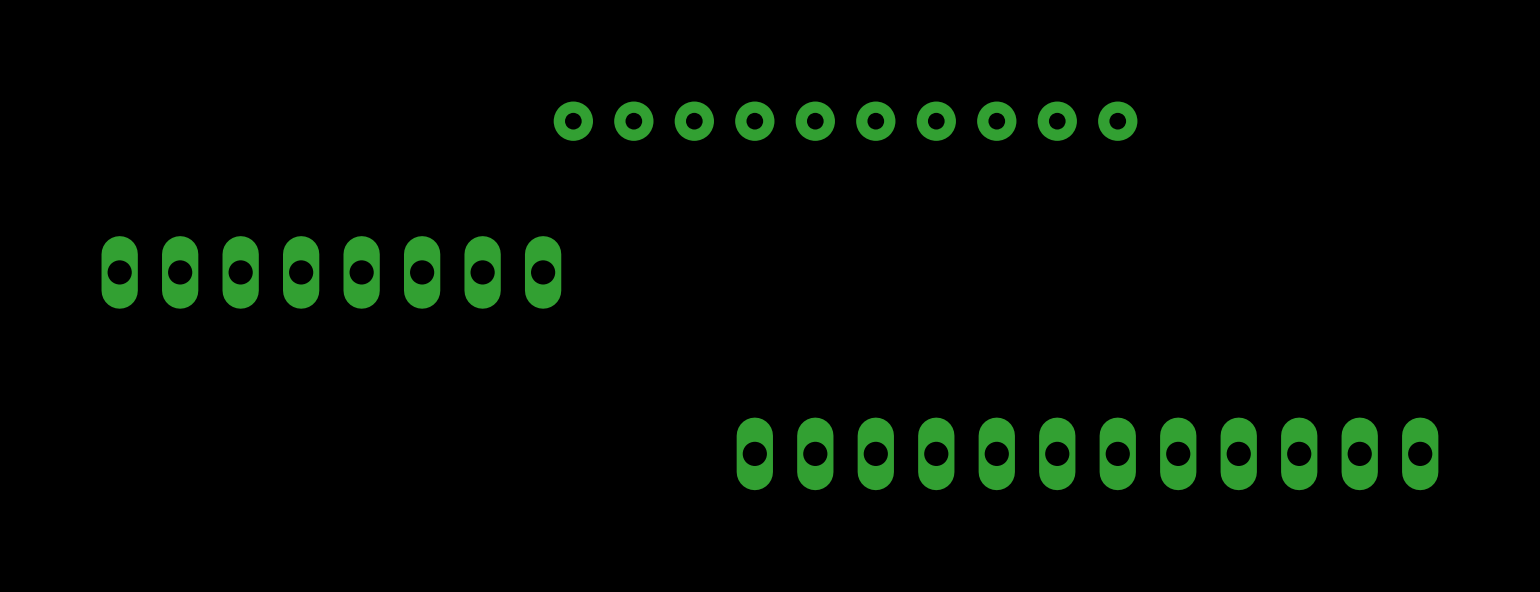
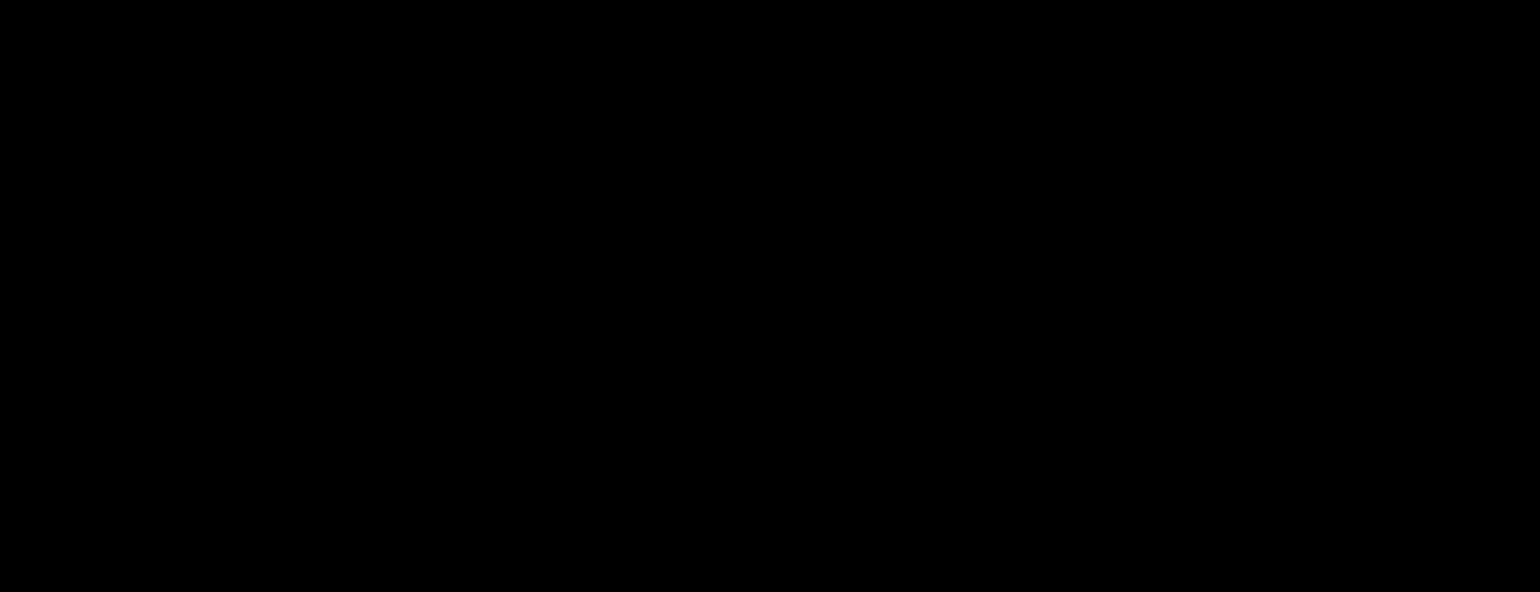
part: (603, 121) -> none
part: (724, 121) -> none
part: (845, 121) -> none
part: (966, 121) -> none
part: (1087, 121) -> none
part: (331, 272) -> none
part: (1087, 453) -> none

